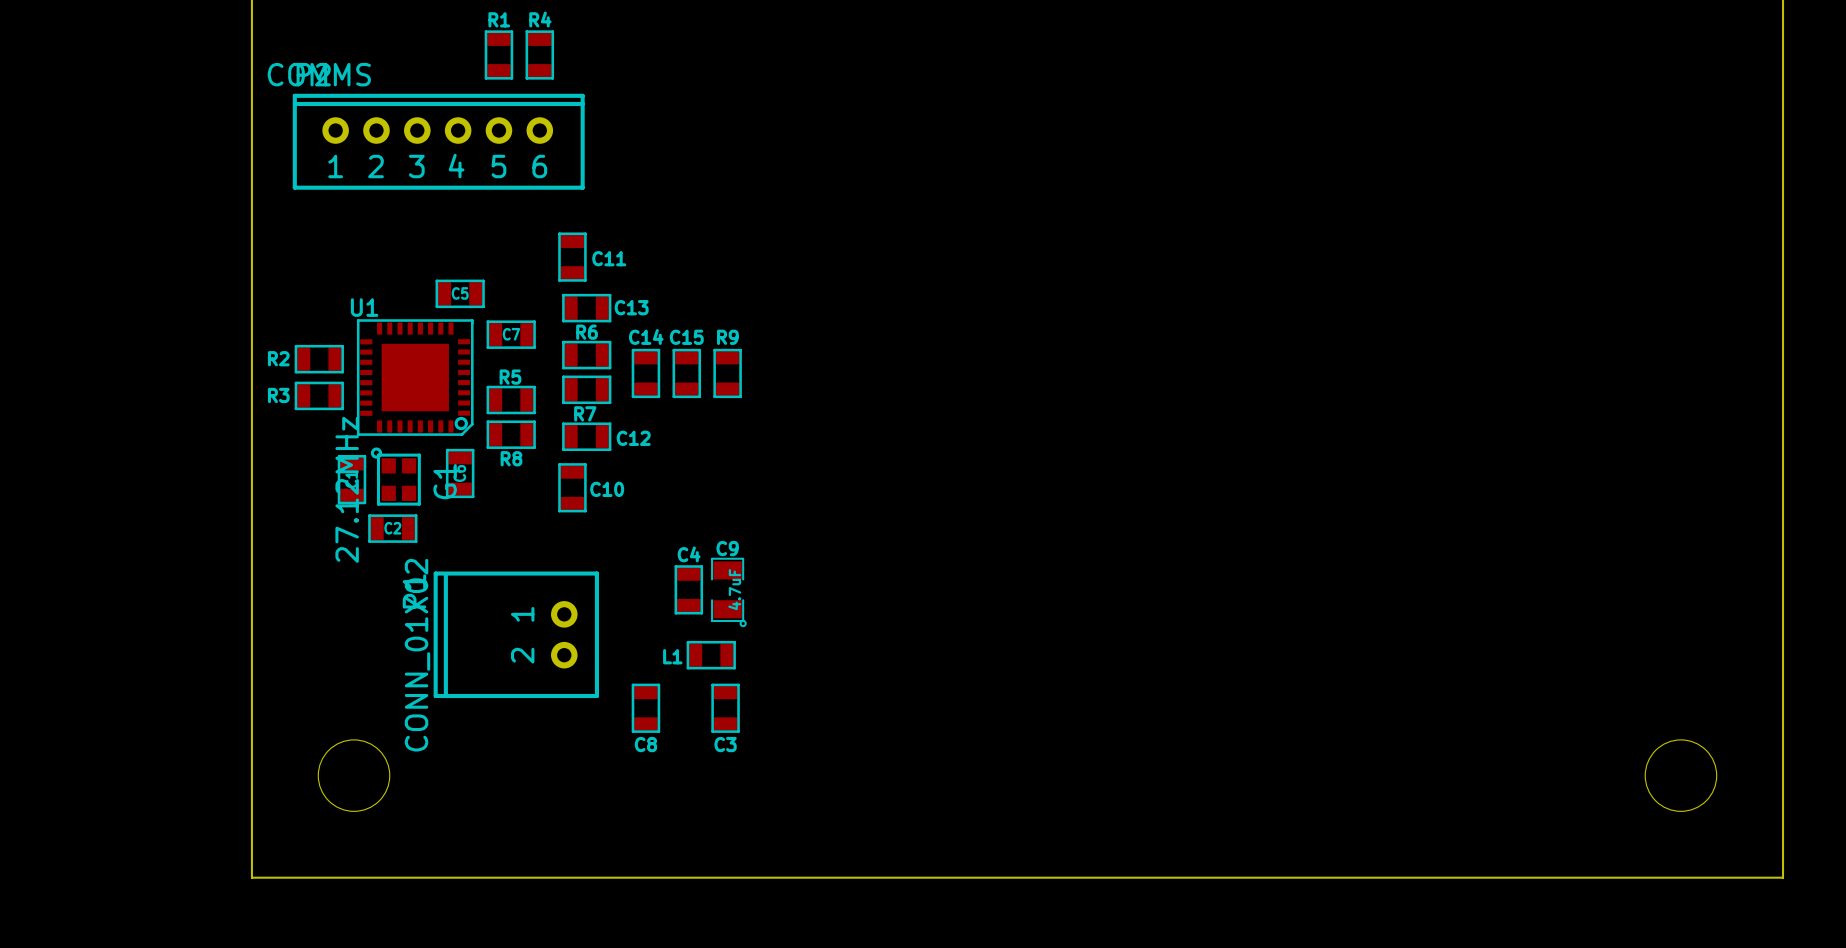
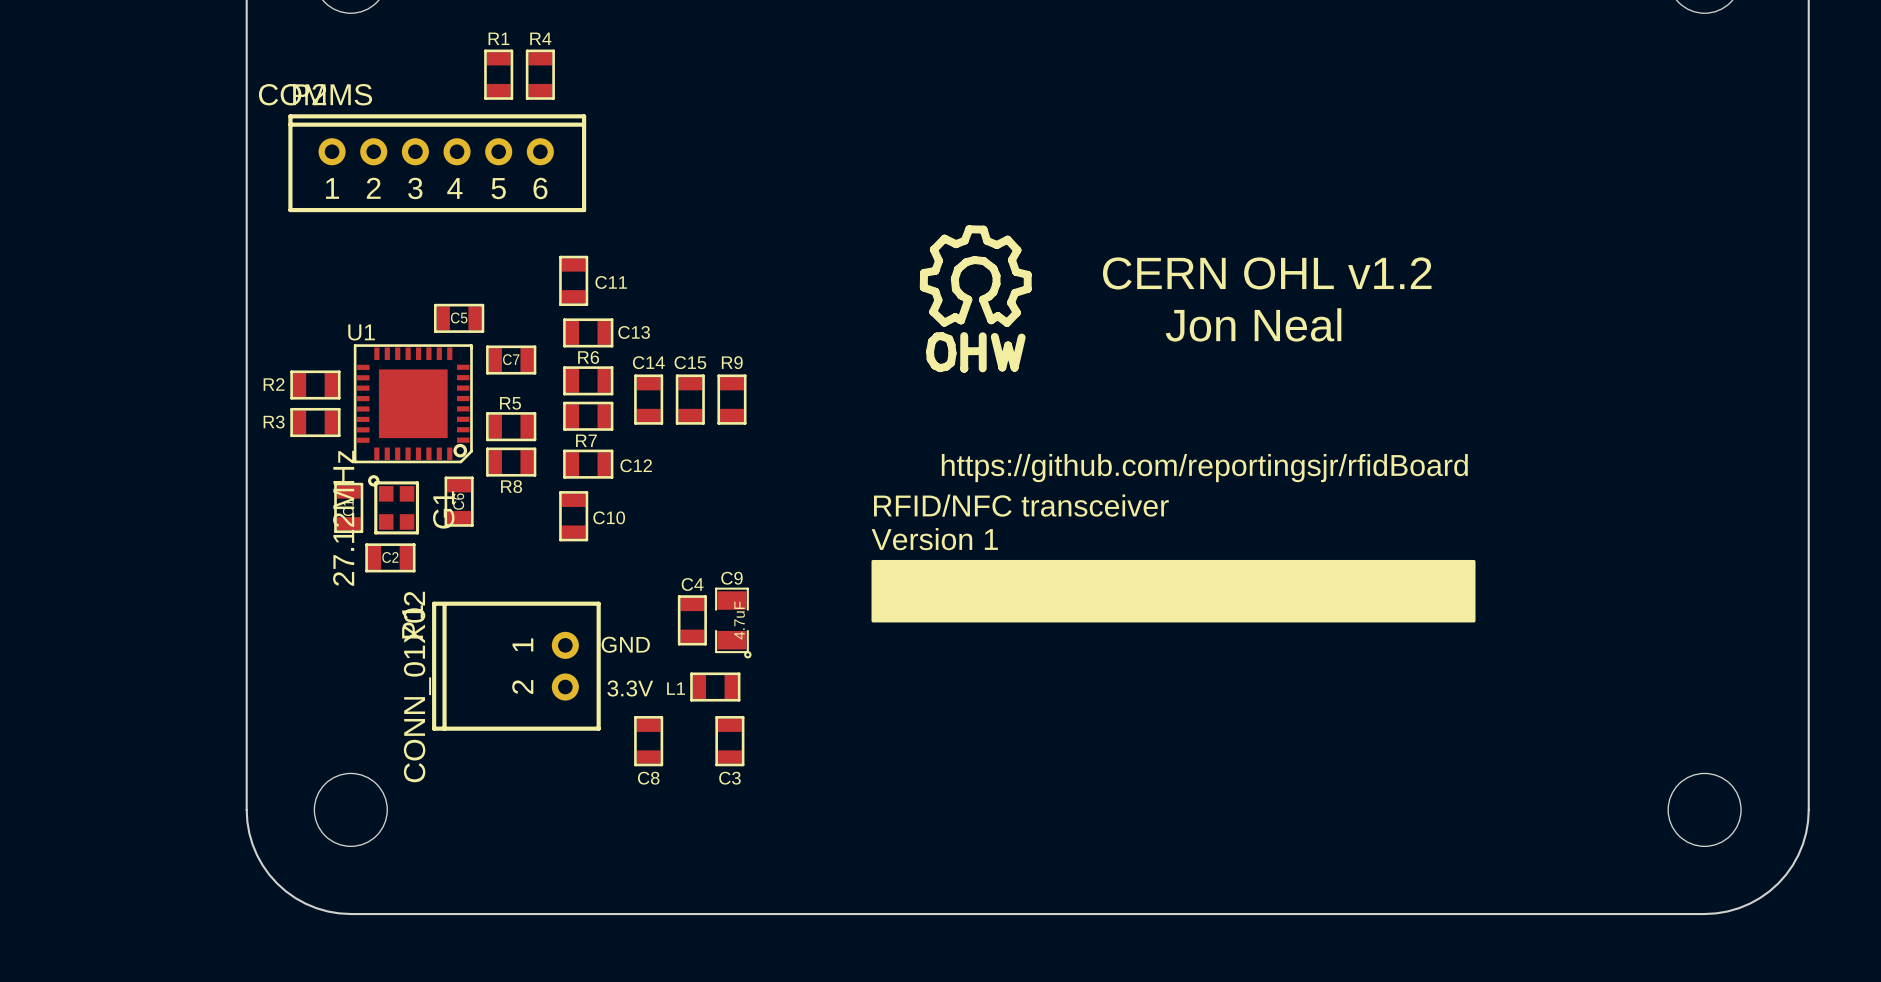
drawing: none -> [919, 225, 1032, 373]
text: none -> CERN OHL v1.2 (1267, 273)
text: none -> Jon Neal (1253, 324)
text: none -> https://github.com/reportingsjr/rfidBoard (1204, 468)
text: none -> RFID/NFC transceiver (1021, 505)
text: none -> Version 1 (934, 539)
drawing: none -> [871, 559, 1476, 623]
text: none -> GND (625, 644)
text: none -> 3.3V (630, 688)
board edge: (251, 775) (251, 877) (354, 877) -> (246, 809) (252, 844) (262, 865) (277, 883) (295, 898) (316, 908) (350, 914)
board edge: (1783, 775) (1783, 877) (1680, 877) -> (1808, 809) (1802, 844) (1792, 865) (1778, 883) (1760, 898) (1739, 908) (1704, 914)

